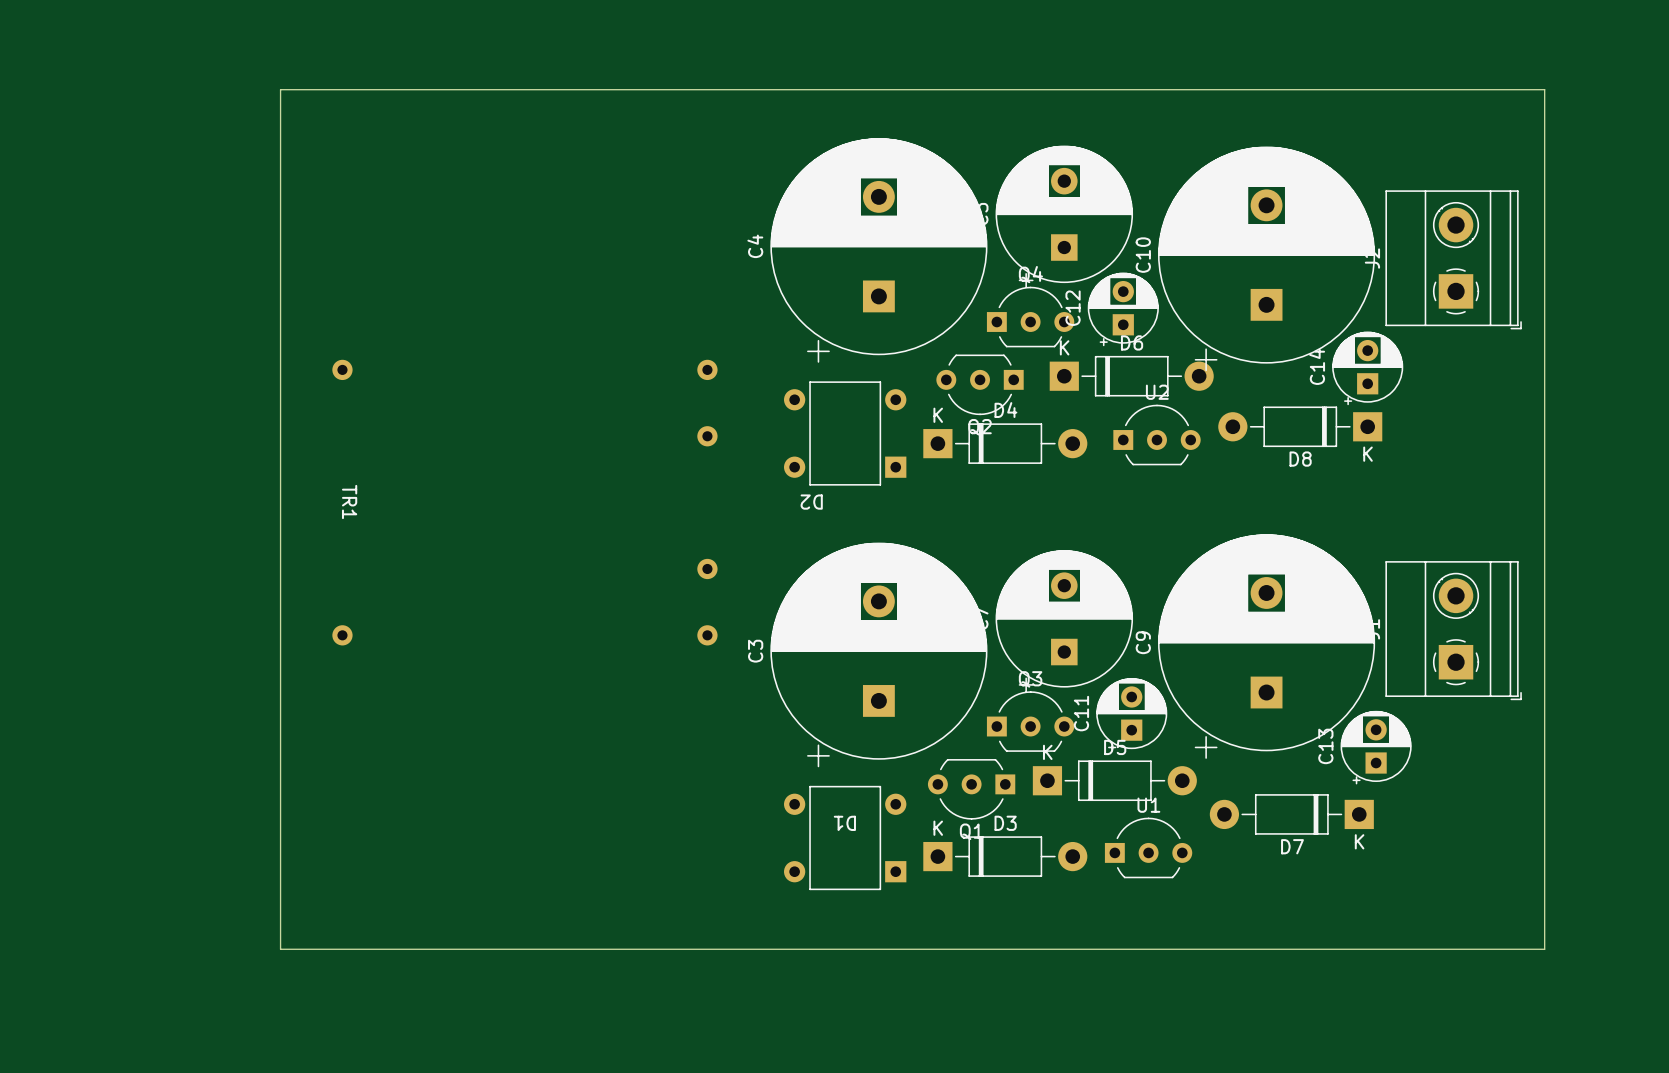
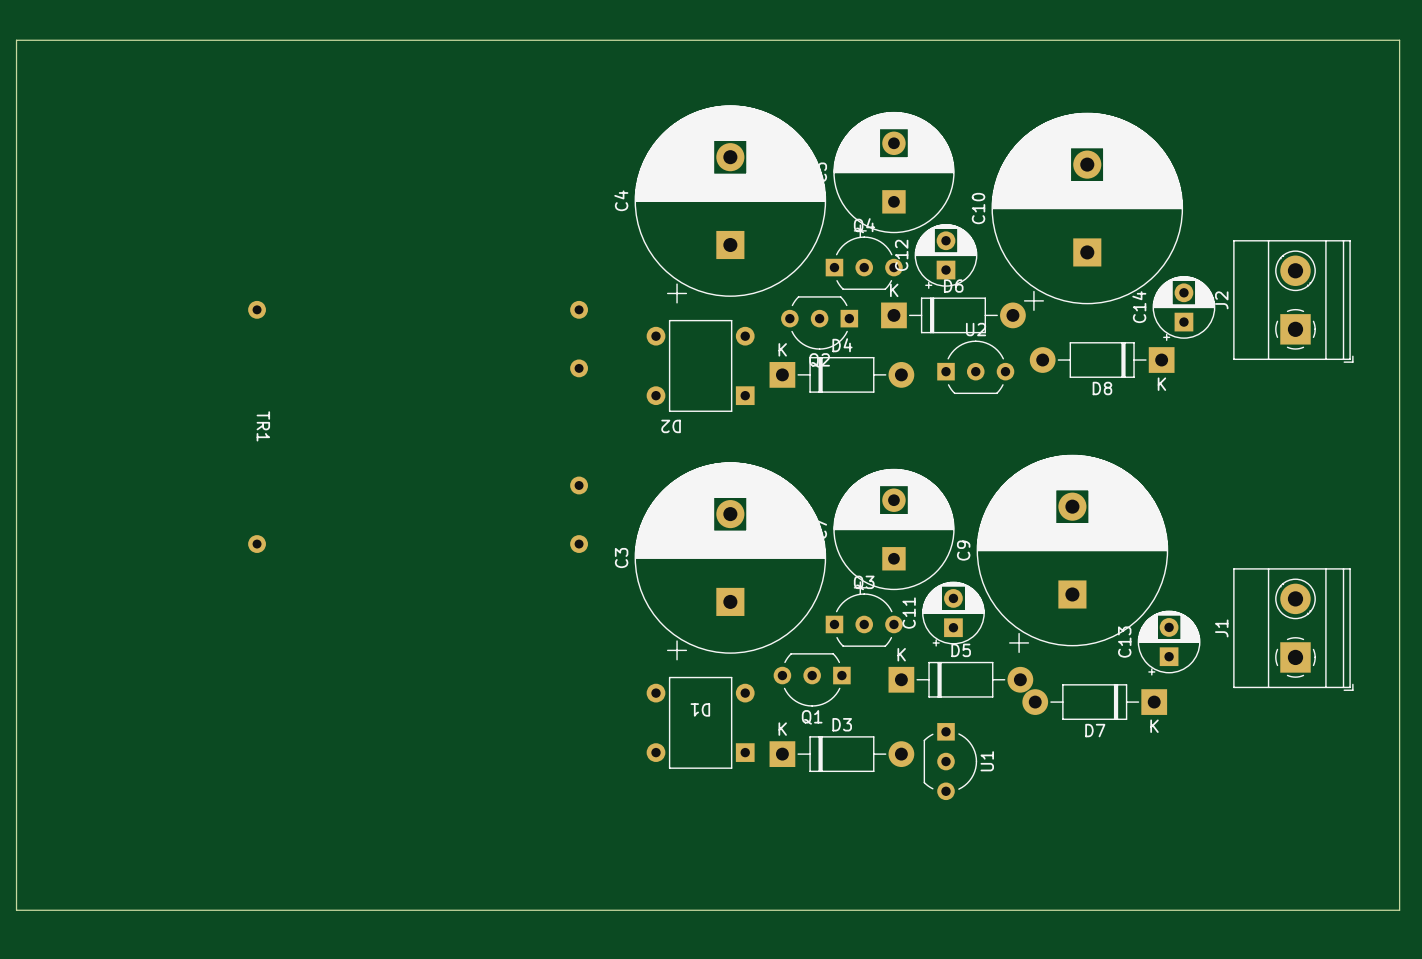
board edge: (280, 89) (1544, 89) (1544, 949) (280, 949) (280, 89) -> (16, 40) (16, 910) (1399, 910) (1399, 40) (16, 40)
C10 position: (1266, 258) -> (1087, 211)
J2 position: (1453, 259) -> (1293, 301)
C14 position: (1367, 368) -> (1183, 308)
J1 position: (1453, 630) -> (1293, 629)
D5 position: (1114, 780) -> (960, 679)
U1 rotation: 0° (1148, 847) -> 90° clockwise (950, 761)
D3 position: (1005, 856) -> (841, 754)

